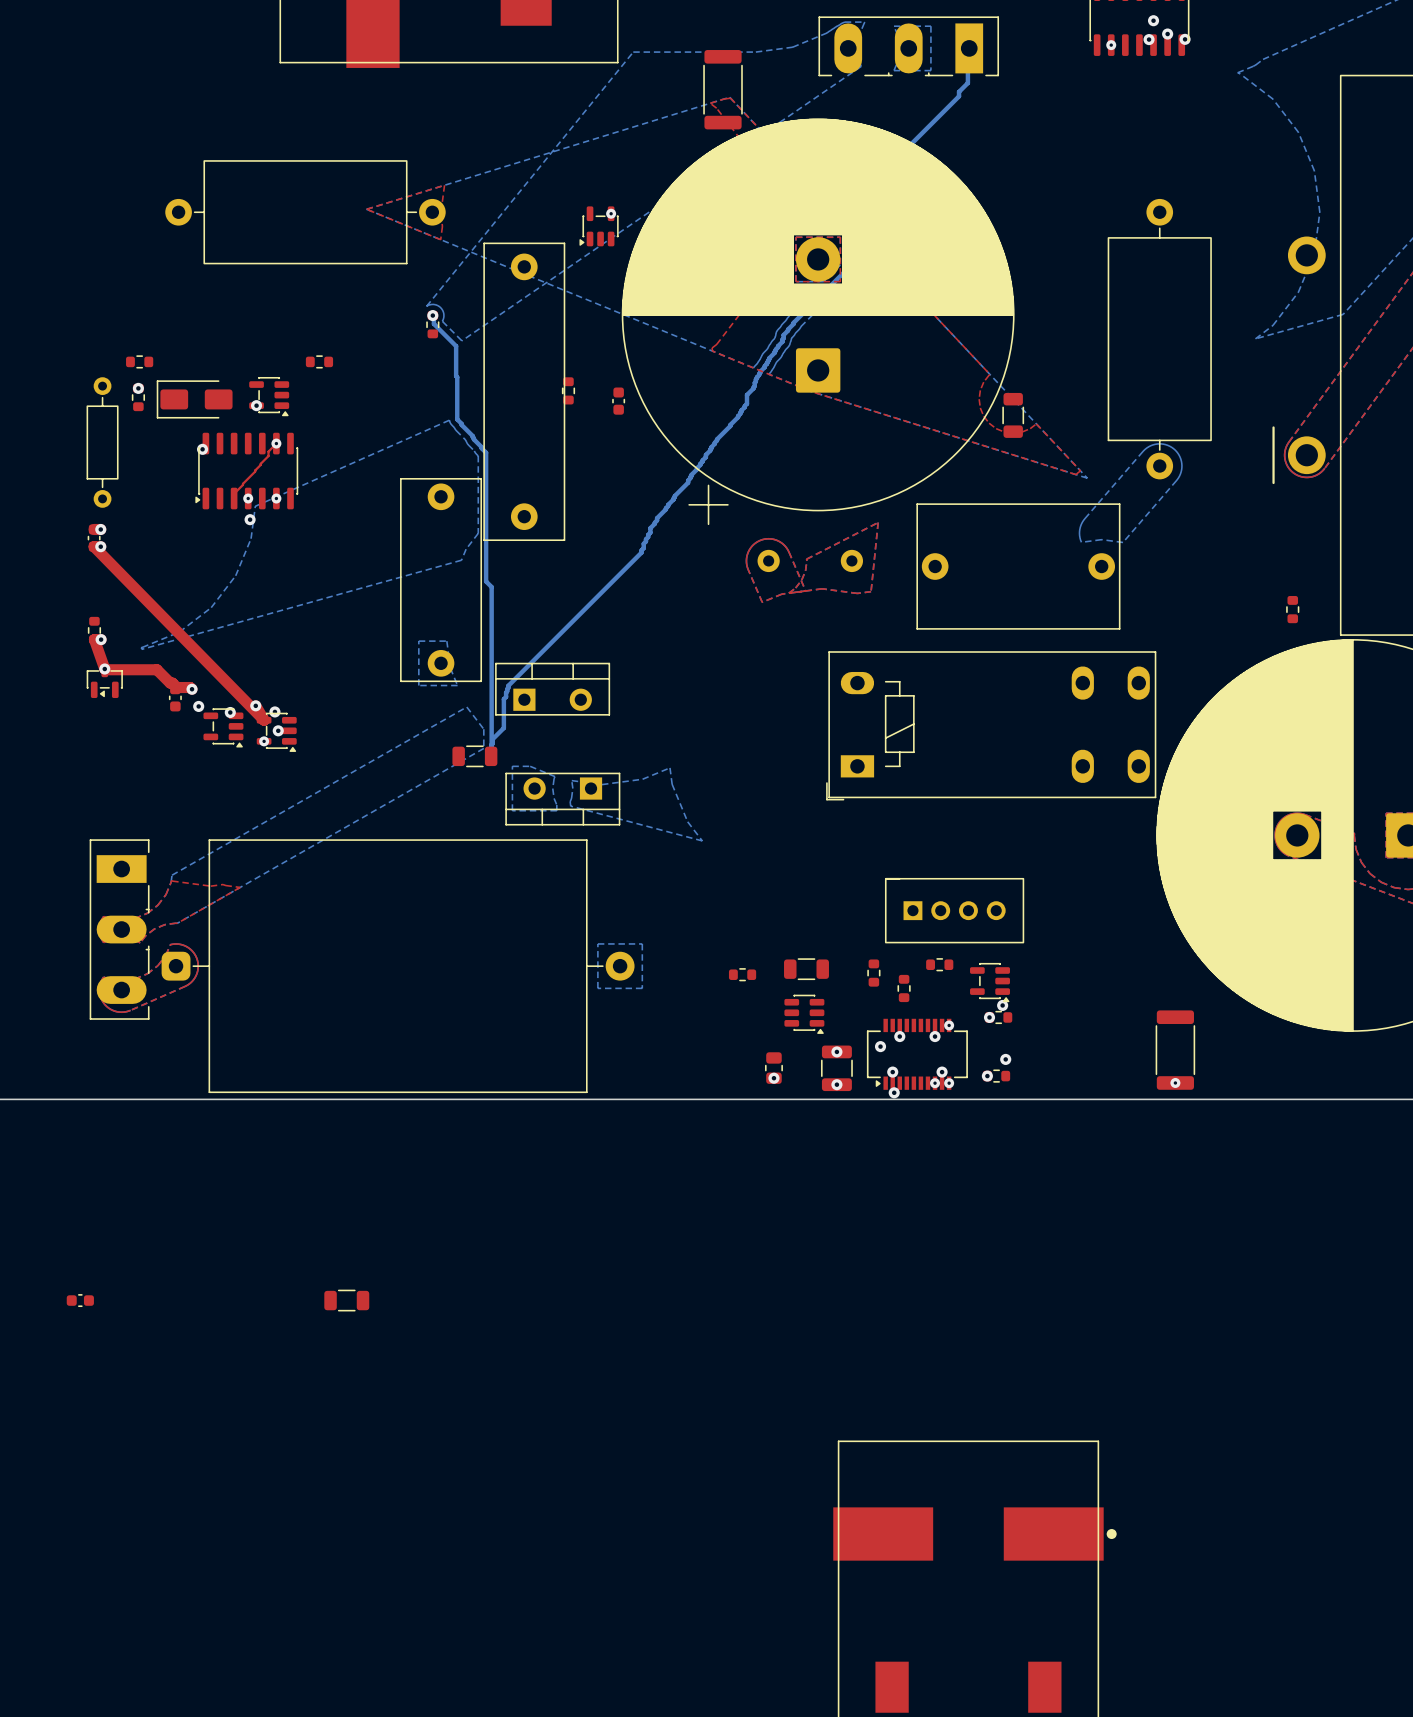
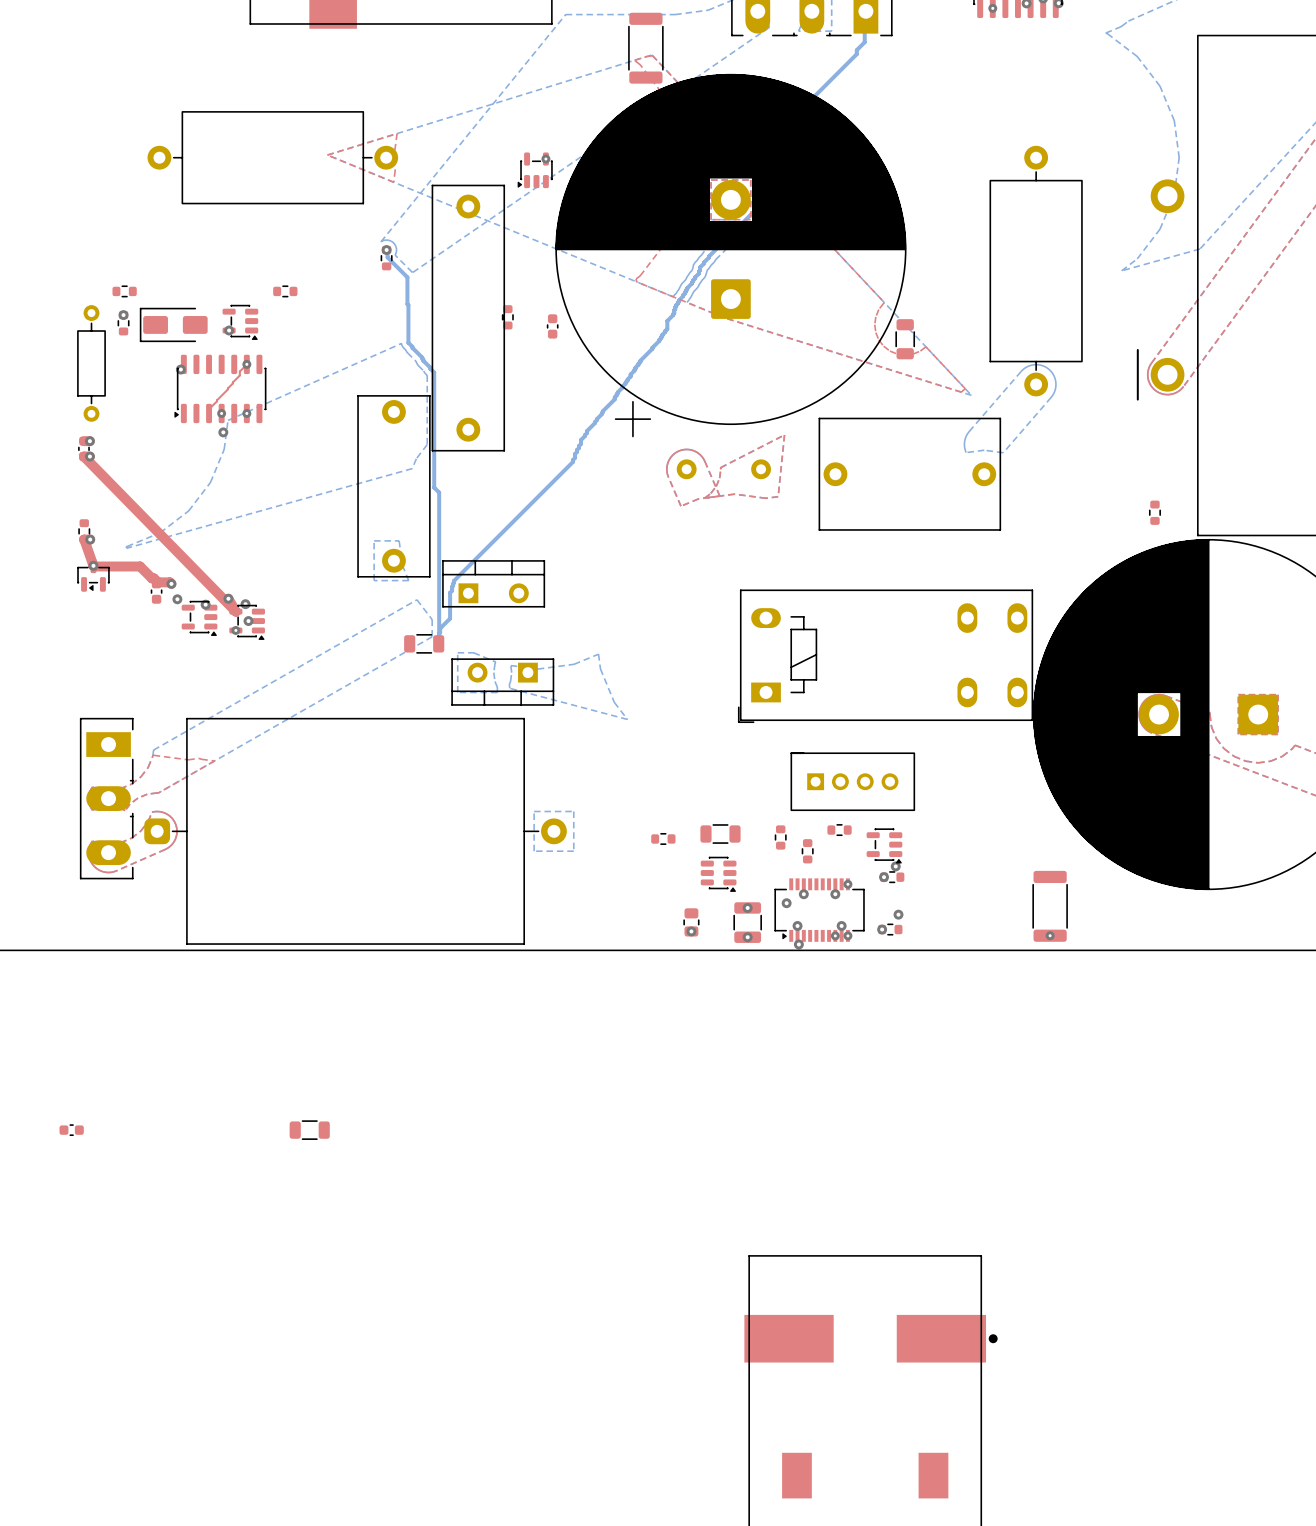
part position: (991, 725) -> (885, 656)

